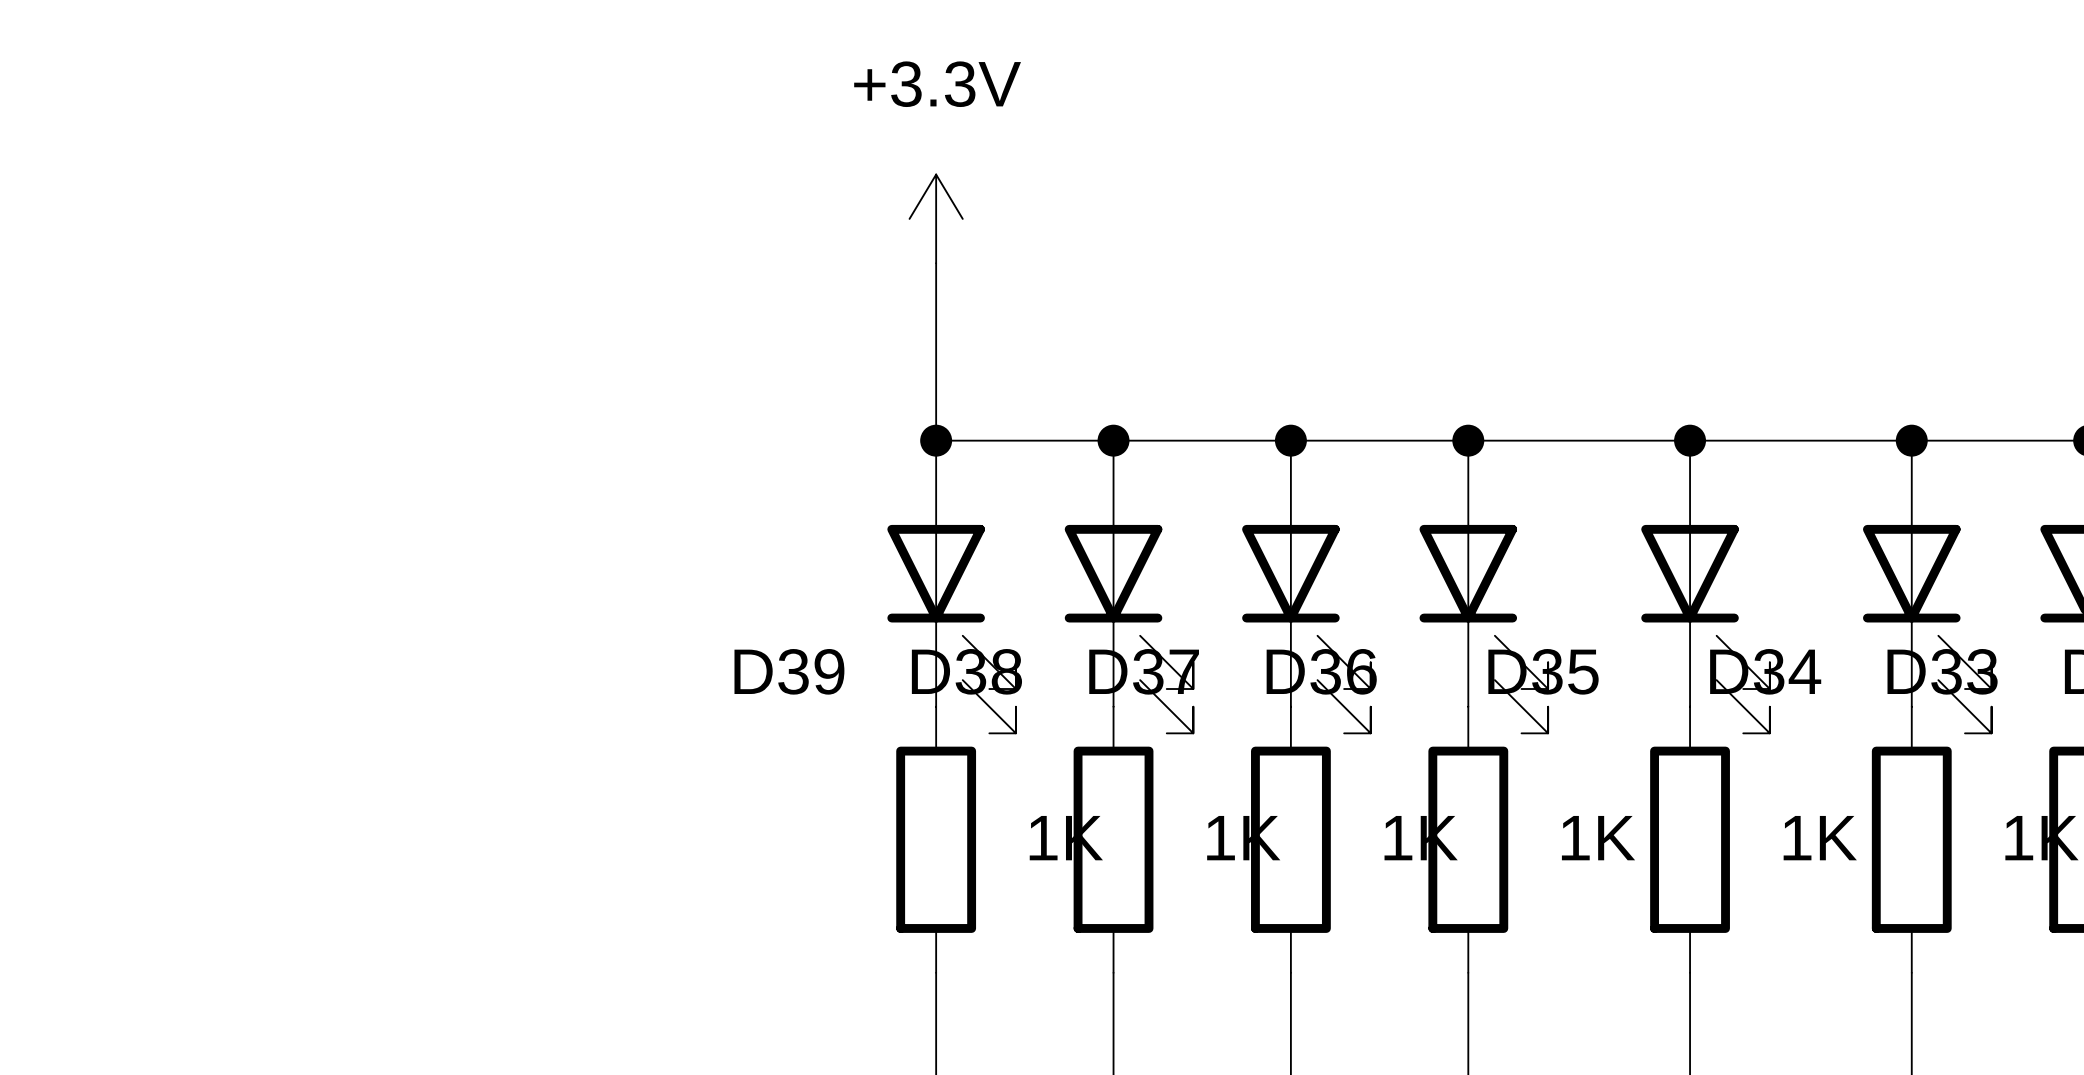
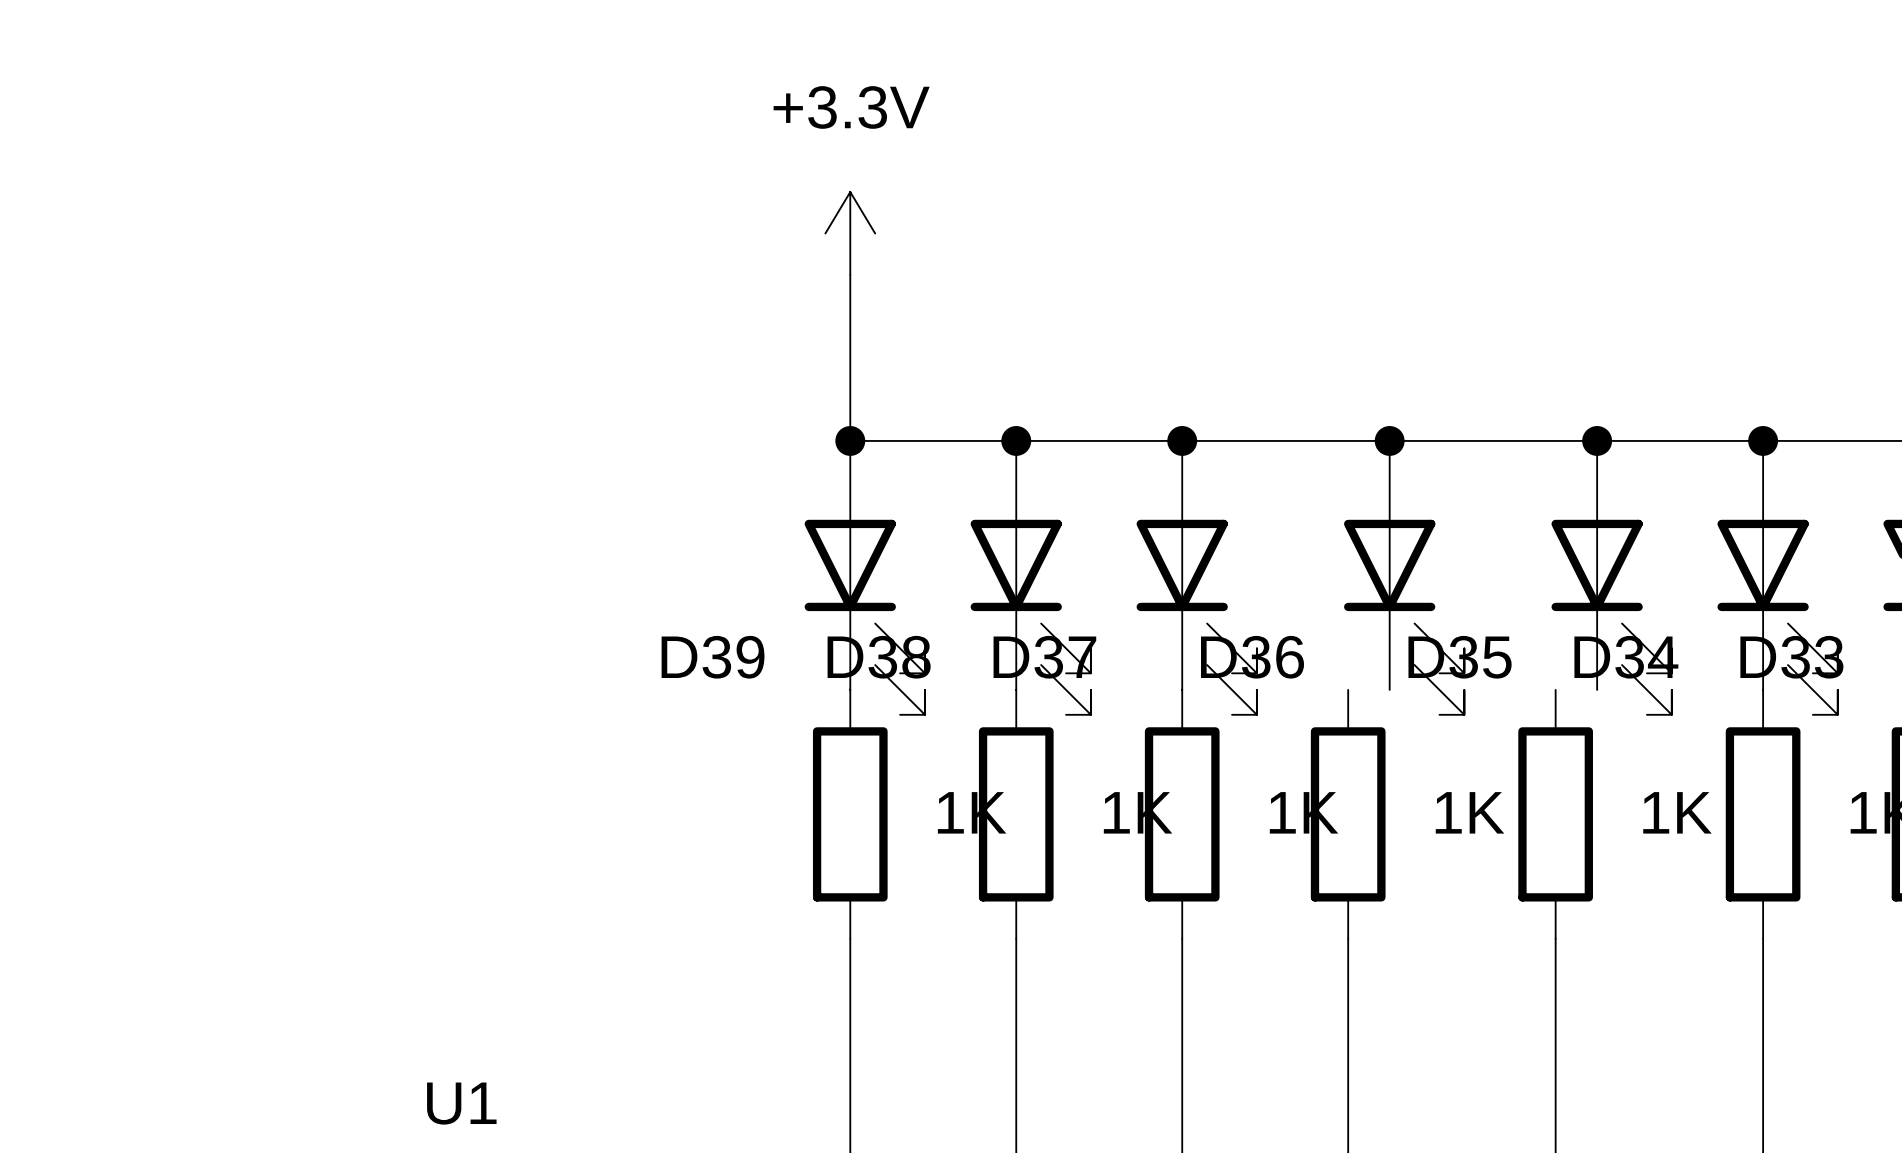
junction position: (1468, 440) -> (1389, 440)
junction position: (1690, 440) -> (1597, 440)
D36 position: (1483, 587) -> (1404, 577)
D35 position: (1705, 587) -> (1611, 577)

